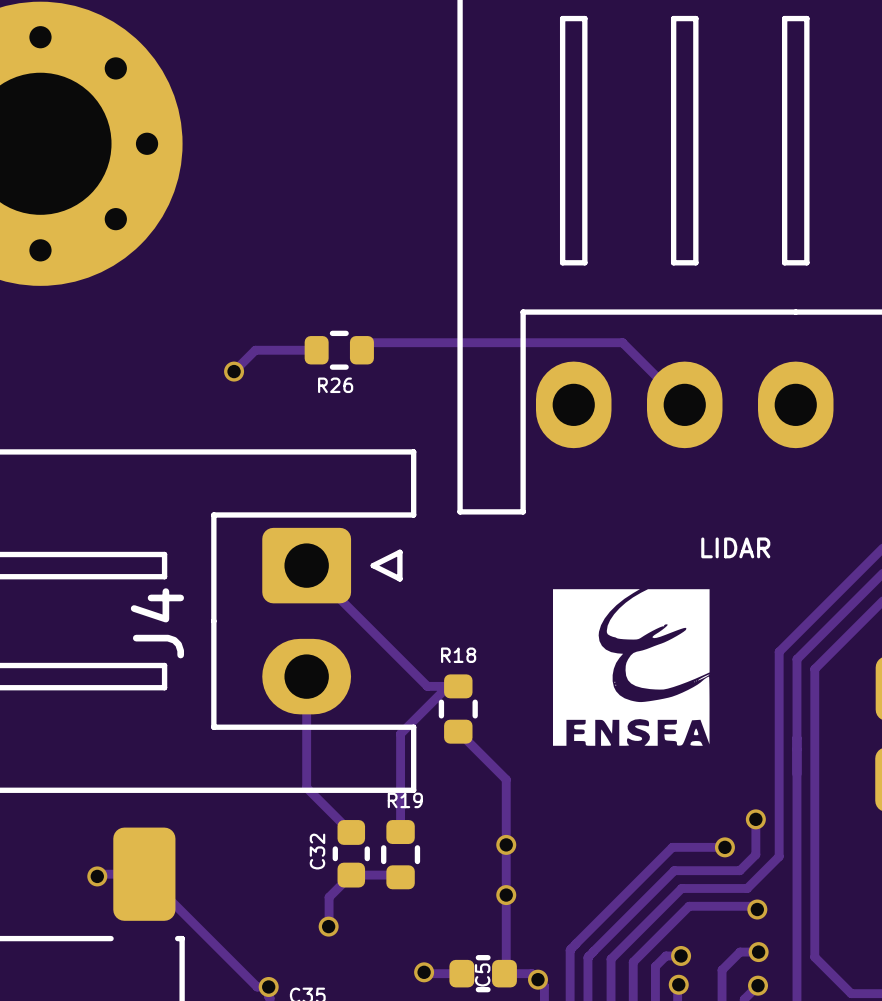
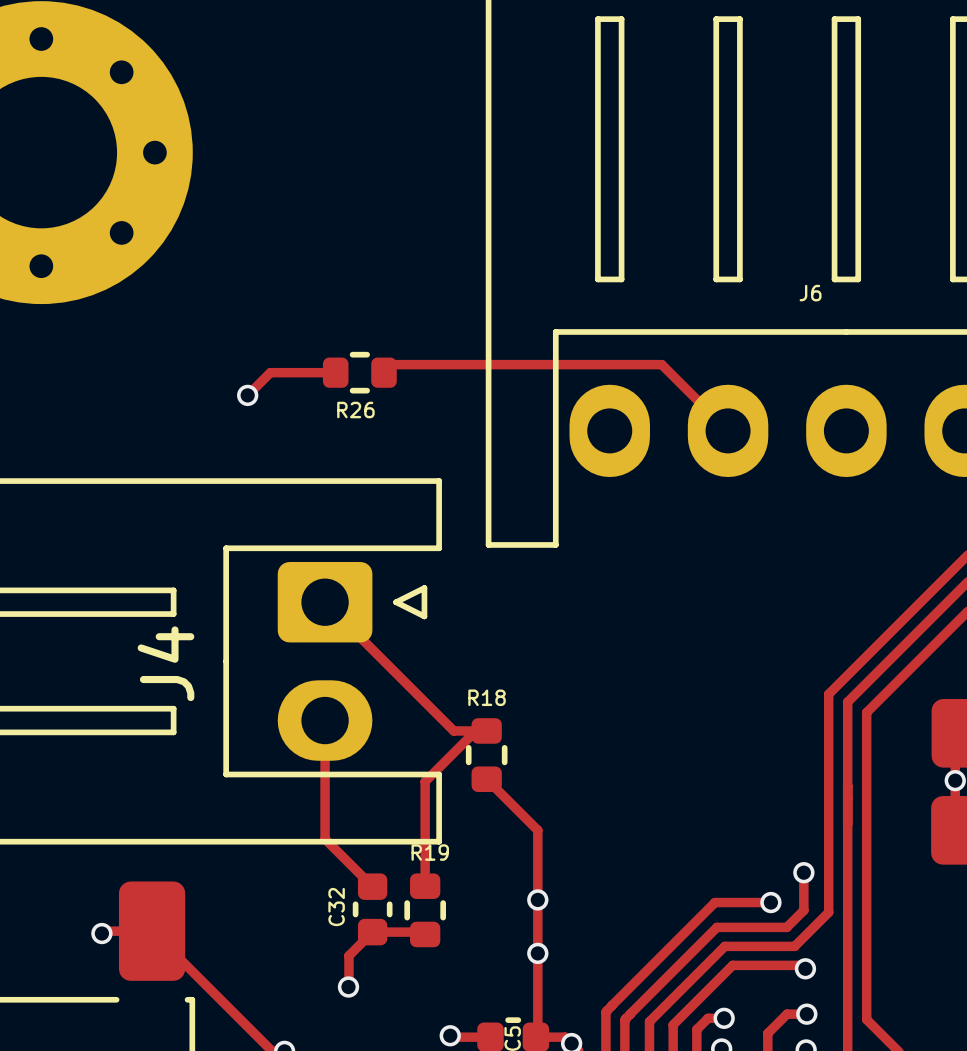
J6 name: none -> J6 (810, 293)
text: LIDAR (735, 547) -> none
drawing: [552, 589, 710, 746] -> none

